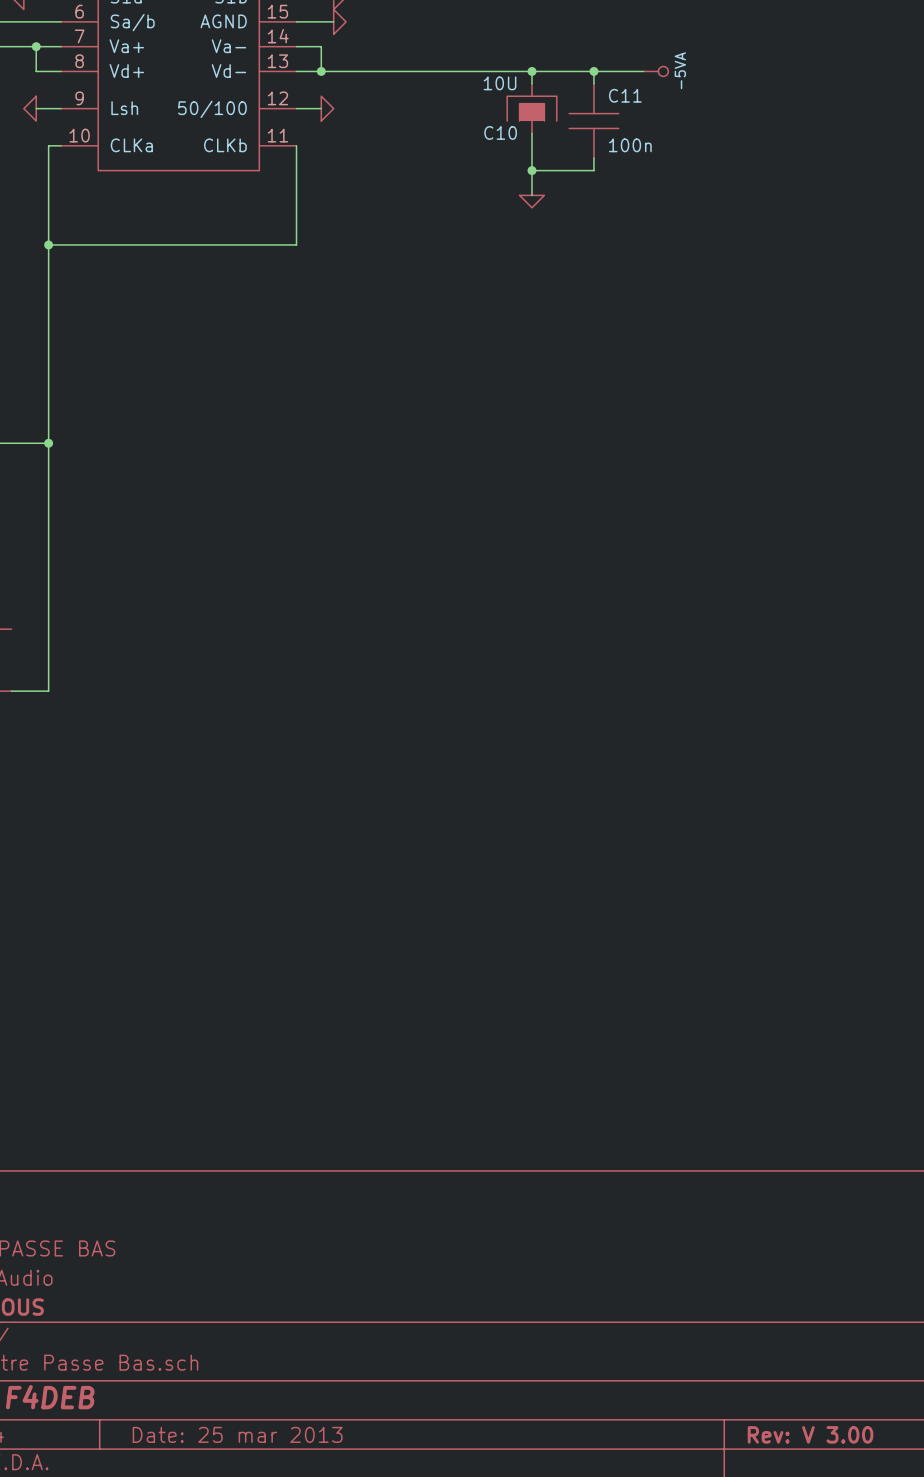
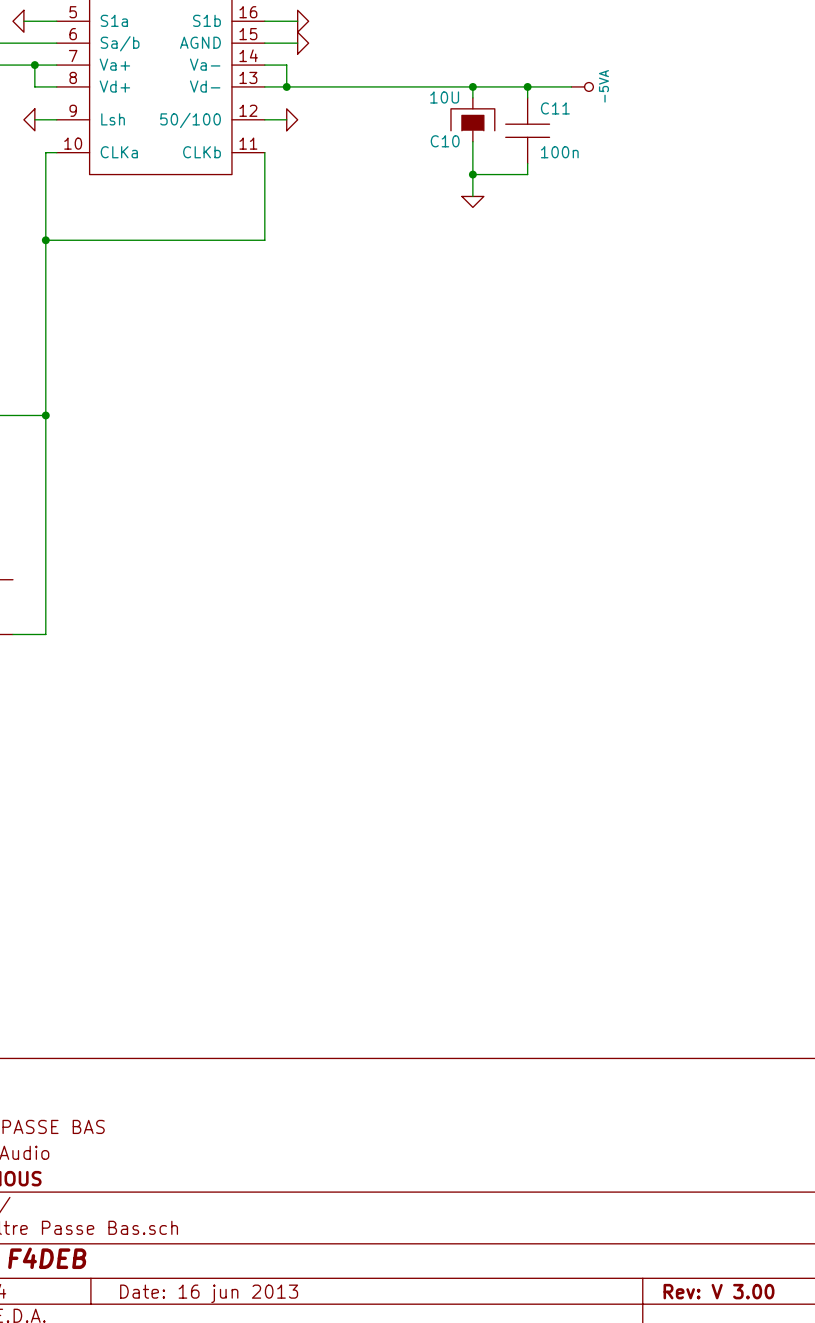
title block: Date: 25 mar 2013 (237, 1434) -> Date: 16 jun 2013 (209, 1293)

